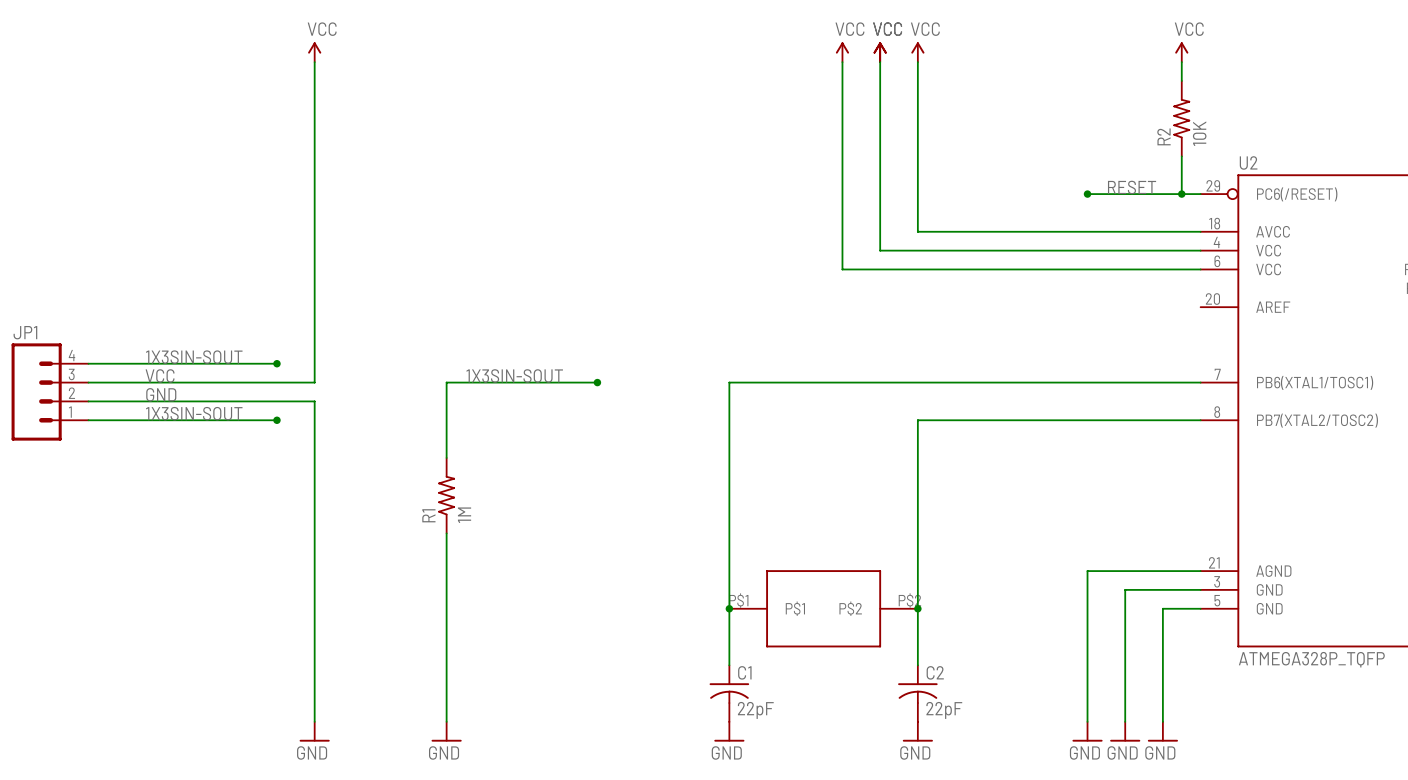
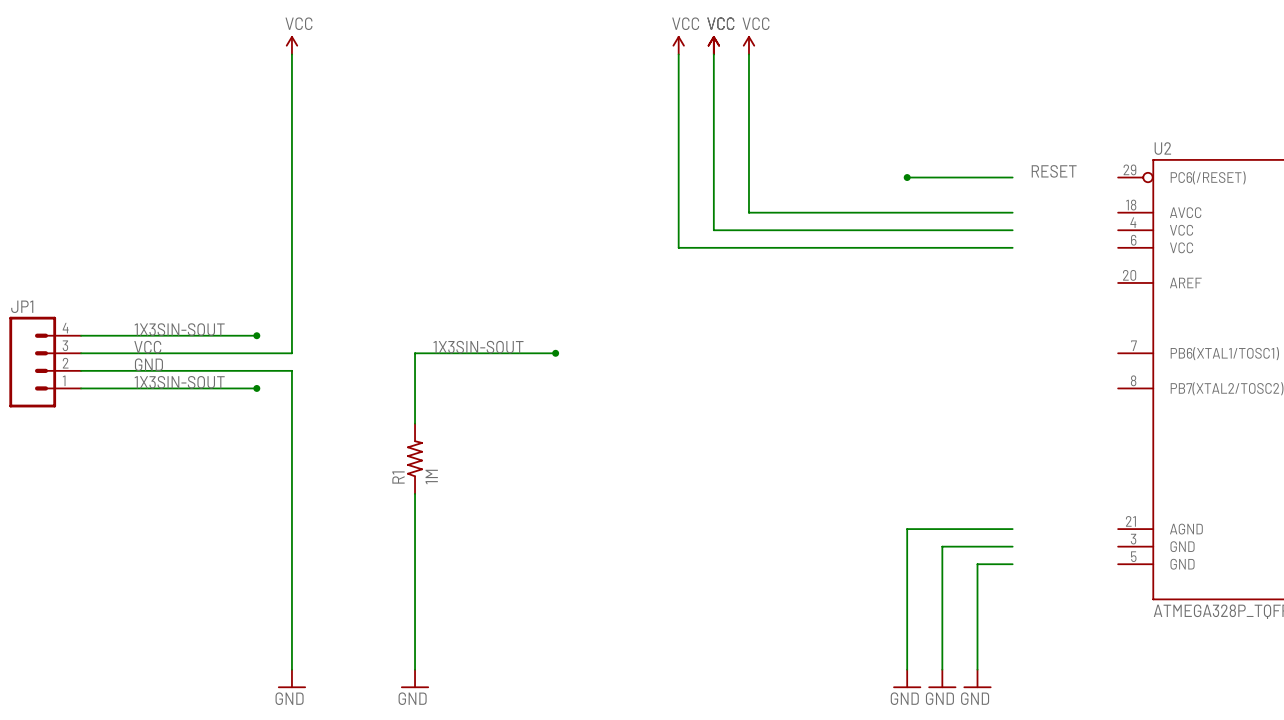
power symbol: none -> VCC (678, 45)
power symbol: none -> VCC (713, 45)
power symbol: none -> VCC (748, 45)
power symbol: VCC (842, 52) -> none
power symbol: VCC (880, 52) -> none
power symbol: VCC (917, 52) -> none
power symbol: VCC (1181, 52) -> none
wire: (842, 62) (842, 269) -> (678, 54) (678, 247) (784, 247)
wire: (880, 62) (880, 250) -> (713, 54) (713, 230) (819, 230)
wire: (917, 62) (917, 231) -> (748, 54) (748, 212) (854, 212)
wire: (1181, 62) (1181, 80) -> none
R2: 10K (1181, 118) -> none
wire: (1181, 156) (1181, 194) -> none
junction: none -> (907, 177)
wire: (1087, 194) (1200, 194) -> (1012, 177) (907, 177)
junction: (1087, 194) -> none
junction: (1181, 194) -> none
wire: (1087, 231) (1200, 231) -> none
wire: (1087, 250) (1200, 250) -> none
wire: (1087, 269) (1200, 269) -> none
wire: (1200, 382) (729, 382) (729, 665) -> none
wire: (1200, 420) (917, 420) (917, 665) -> none
wire: (1200, 571) (1087, 571) (1087, 721) -> (1012, 529) (907, 529) (907, 669)
wire: (1200, 589) (1125, 589) (1125, 721) -> (1012, 546) (942, 546) (942, 669)
junction: (729, 608) -> none
part: (823, 608) -> none
junction: (917, 608) -> none
wire: (1200, 608) (1162, 608) (1162, 721) -> (1012, 564) (977, 564) (977, 669)
C1: 22pF (729, 693) -> none
C2: 22pF (917, 693) -> none
power symbol: GND (729, 731) -> none
power symbol: GND (917, 731) -> none
power symbol: none -> GND (907, 678)
power symbol: none -> GND (942, 678)
power symbol: none -> GND (977, 678)
power symbol: GND (1087, 731) -> none
power symbol: GND (1125, 731) -> none
power symbol: GND (1162, 731) -> none

